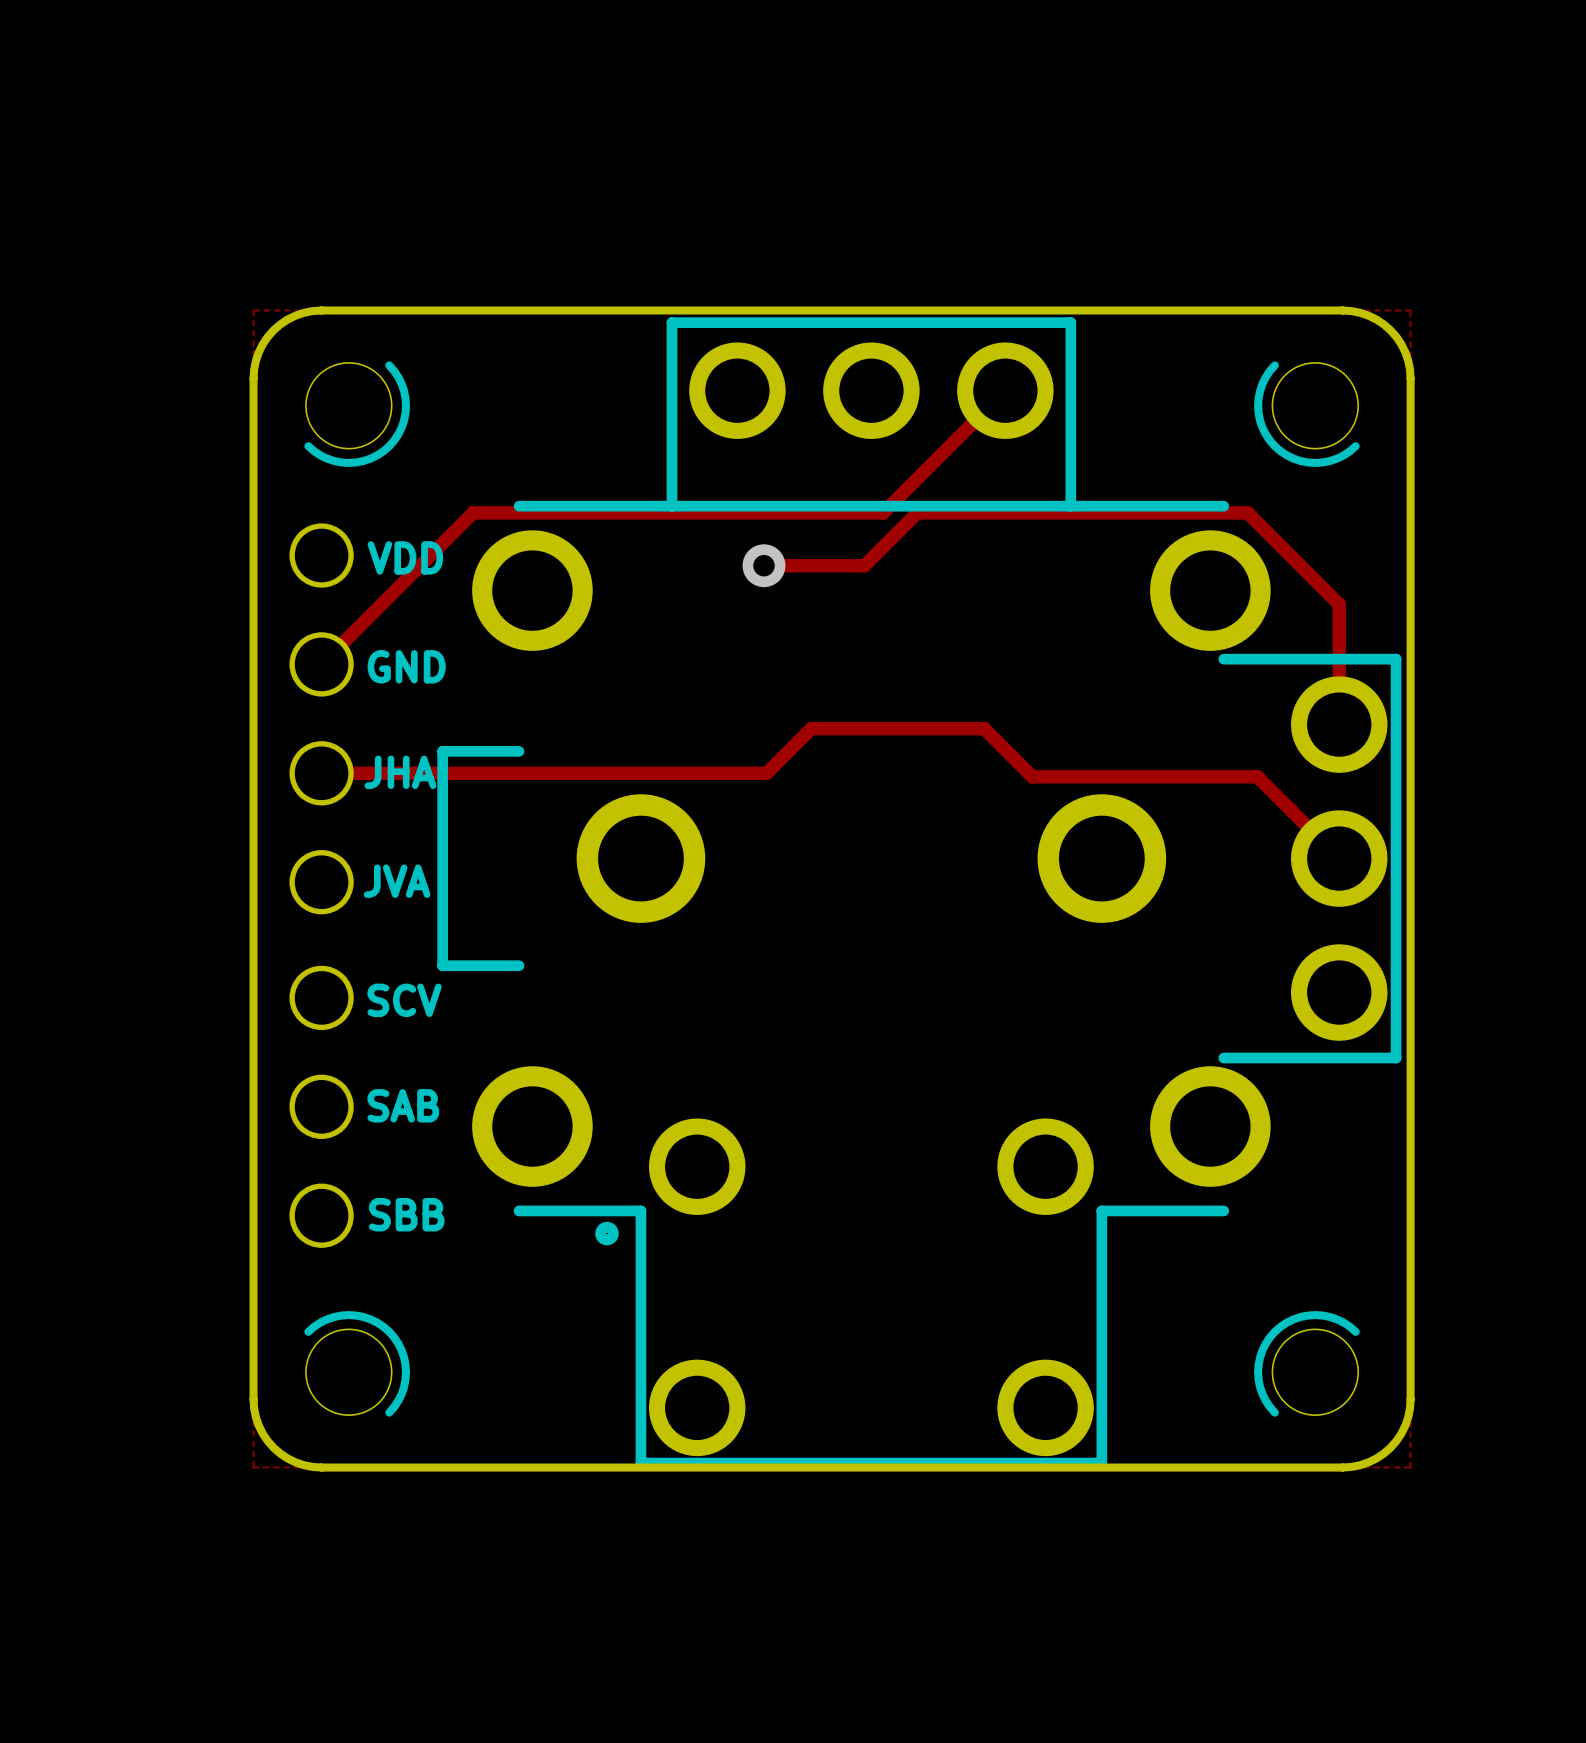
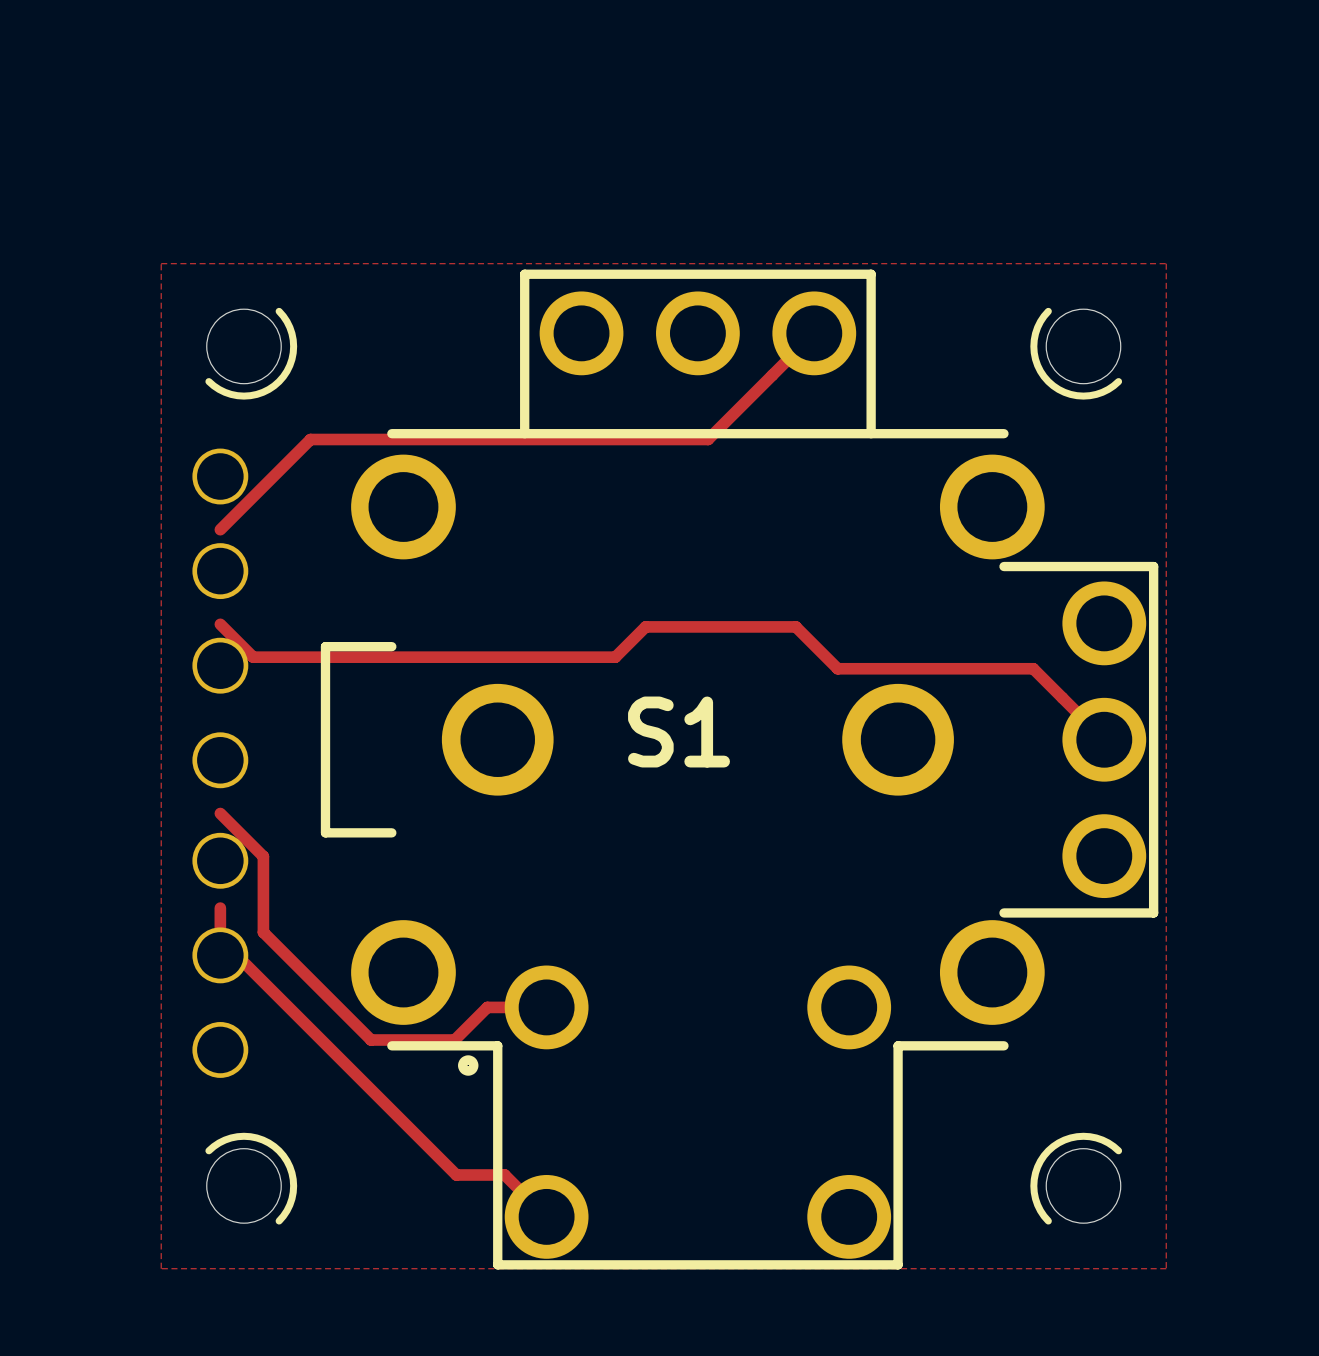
board edge: (321, 310) (1342, 310) (1368, 315) (1390, 330) (1405, 352) (1410, 378) (1410, 1399) (1405, 1425) (1390, 1447) (1368, 1462) (1342, 1467) (321, 1467) (295, 1462) (273, 1447) (258, 1425) (253, 1399) (253, 378) (258, 352) (273, 330) (295, 315) (321, 310) -> none
track: (473, 512) (321, 664) -> (351, 439) (310, 439) (220, 529)
text: VDD (405, 557) -> none
track: (764, 565) (864, 565) (917, 512) (1247, 512) (1339, 604) (1339, 724) -> none
via: (764, 565) -> none
text: GND (406, 666) -> none
track: (776, 763) (766, 773) (321, 773) -> (615, 657) (253, 657) (220, 624)
text: JHA (400, 772) -> none
S1 name: none -> S1 (679, 732)
text: JVA (397, 881) -> none
track: none -> (220, 813) (263, 856) (263, 932) (371, 1040) (454, 1040) (487, 1007) (546, 1007)
text: SCV (404, 1000) -> none
track: none -> (220, 908) (220, 938) (456, 1175) (504, 1175) (546, 1216)
text: SAB (403, 1105) -> none
text: SBB (406, 1214) -> none

